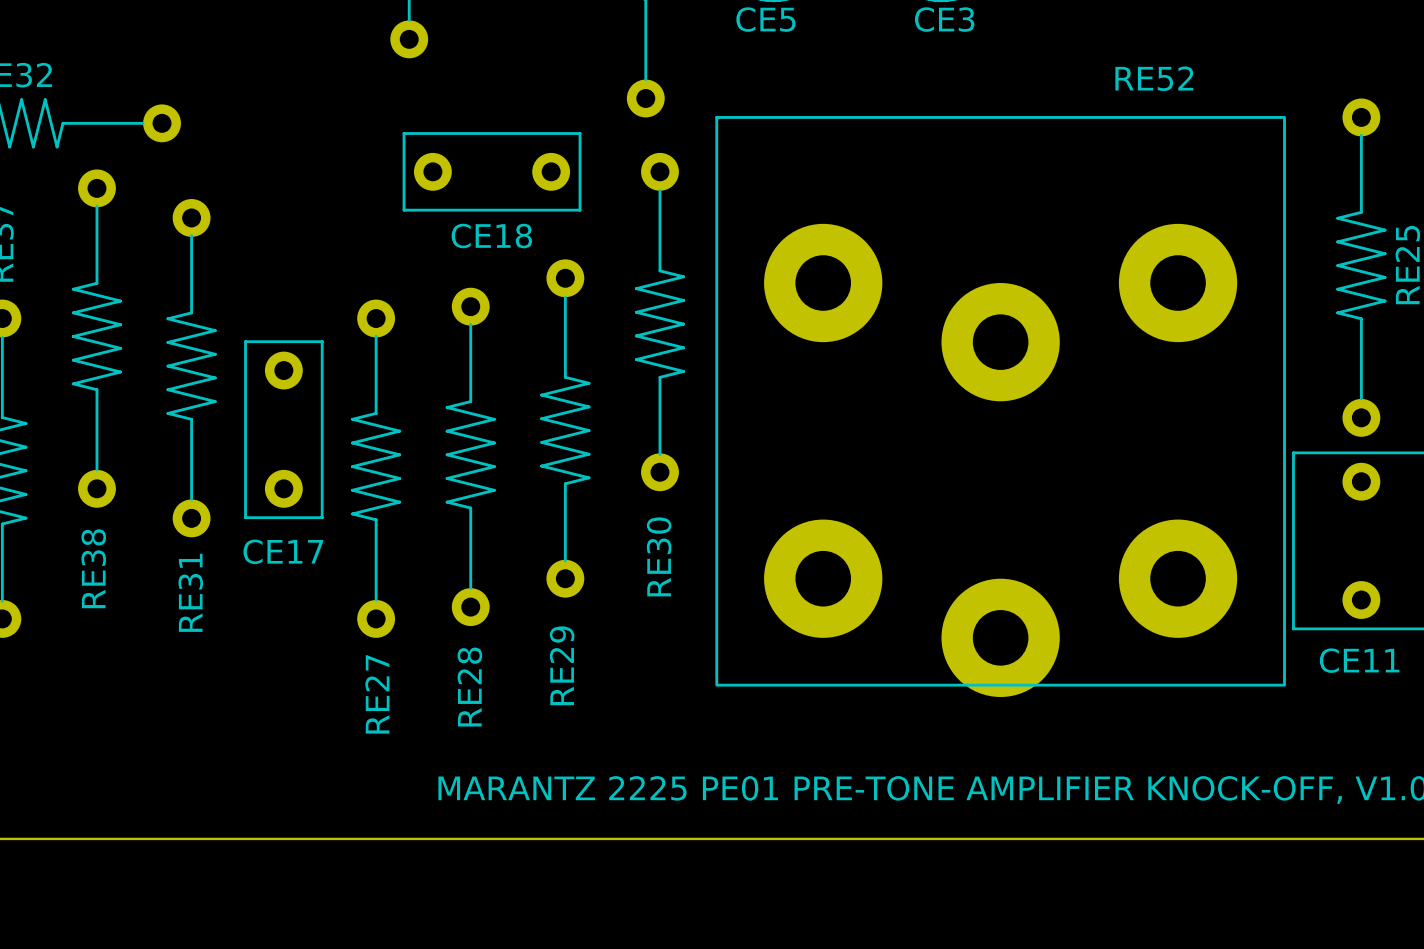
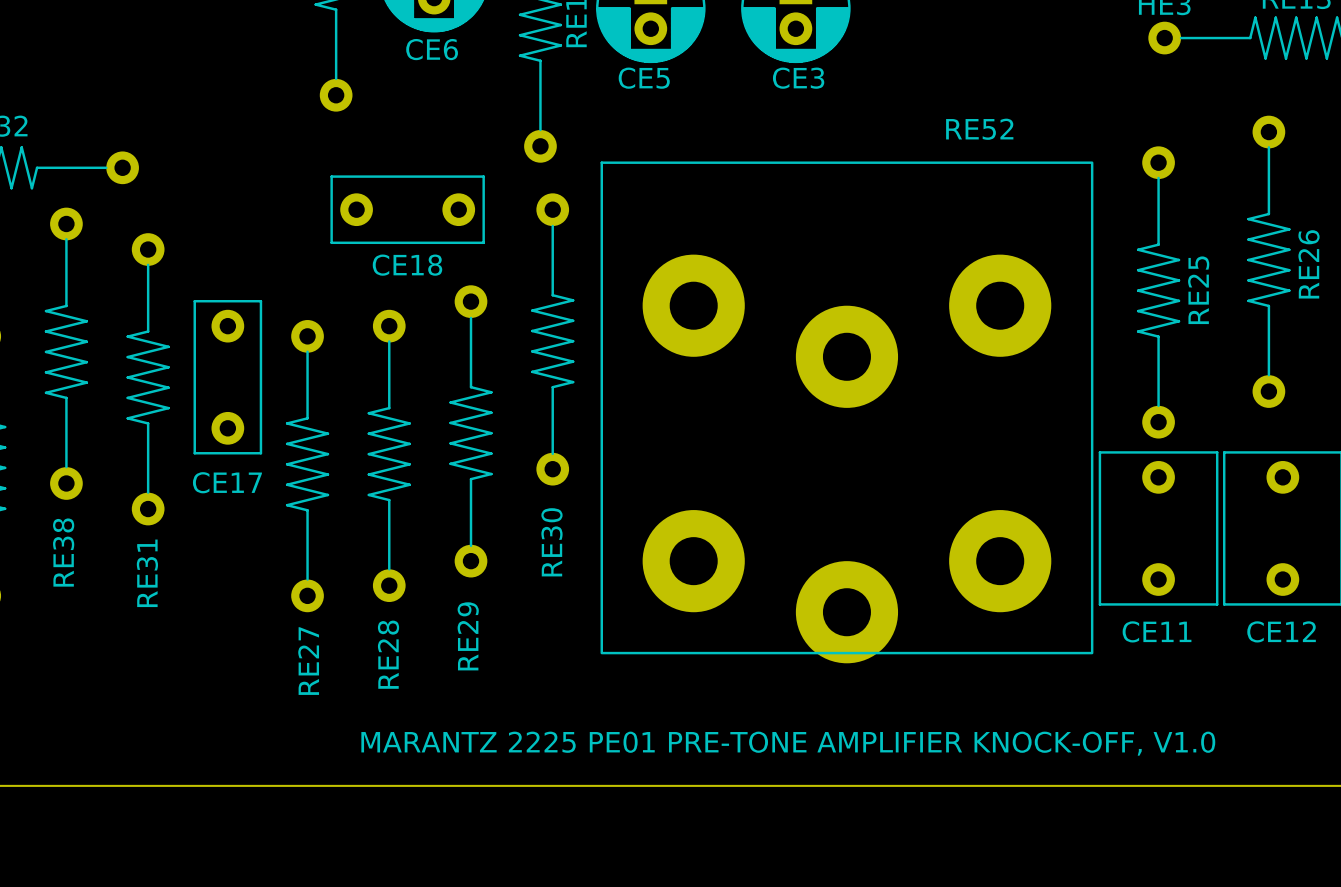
CE17 position: (283, 429) -> (227, 377)

